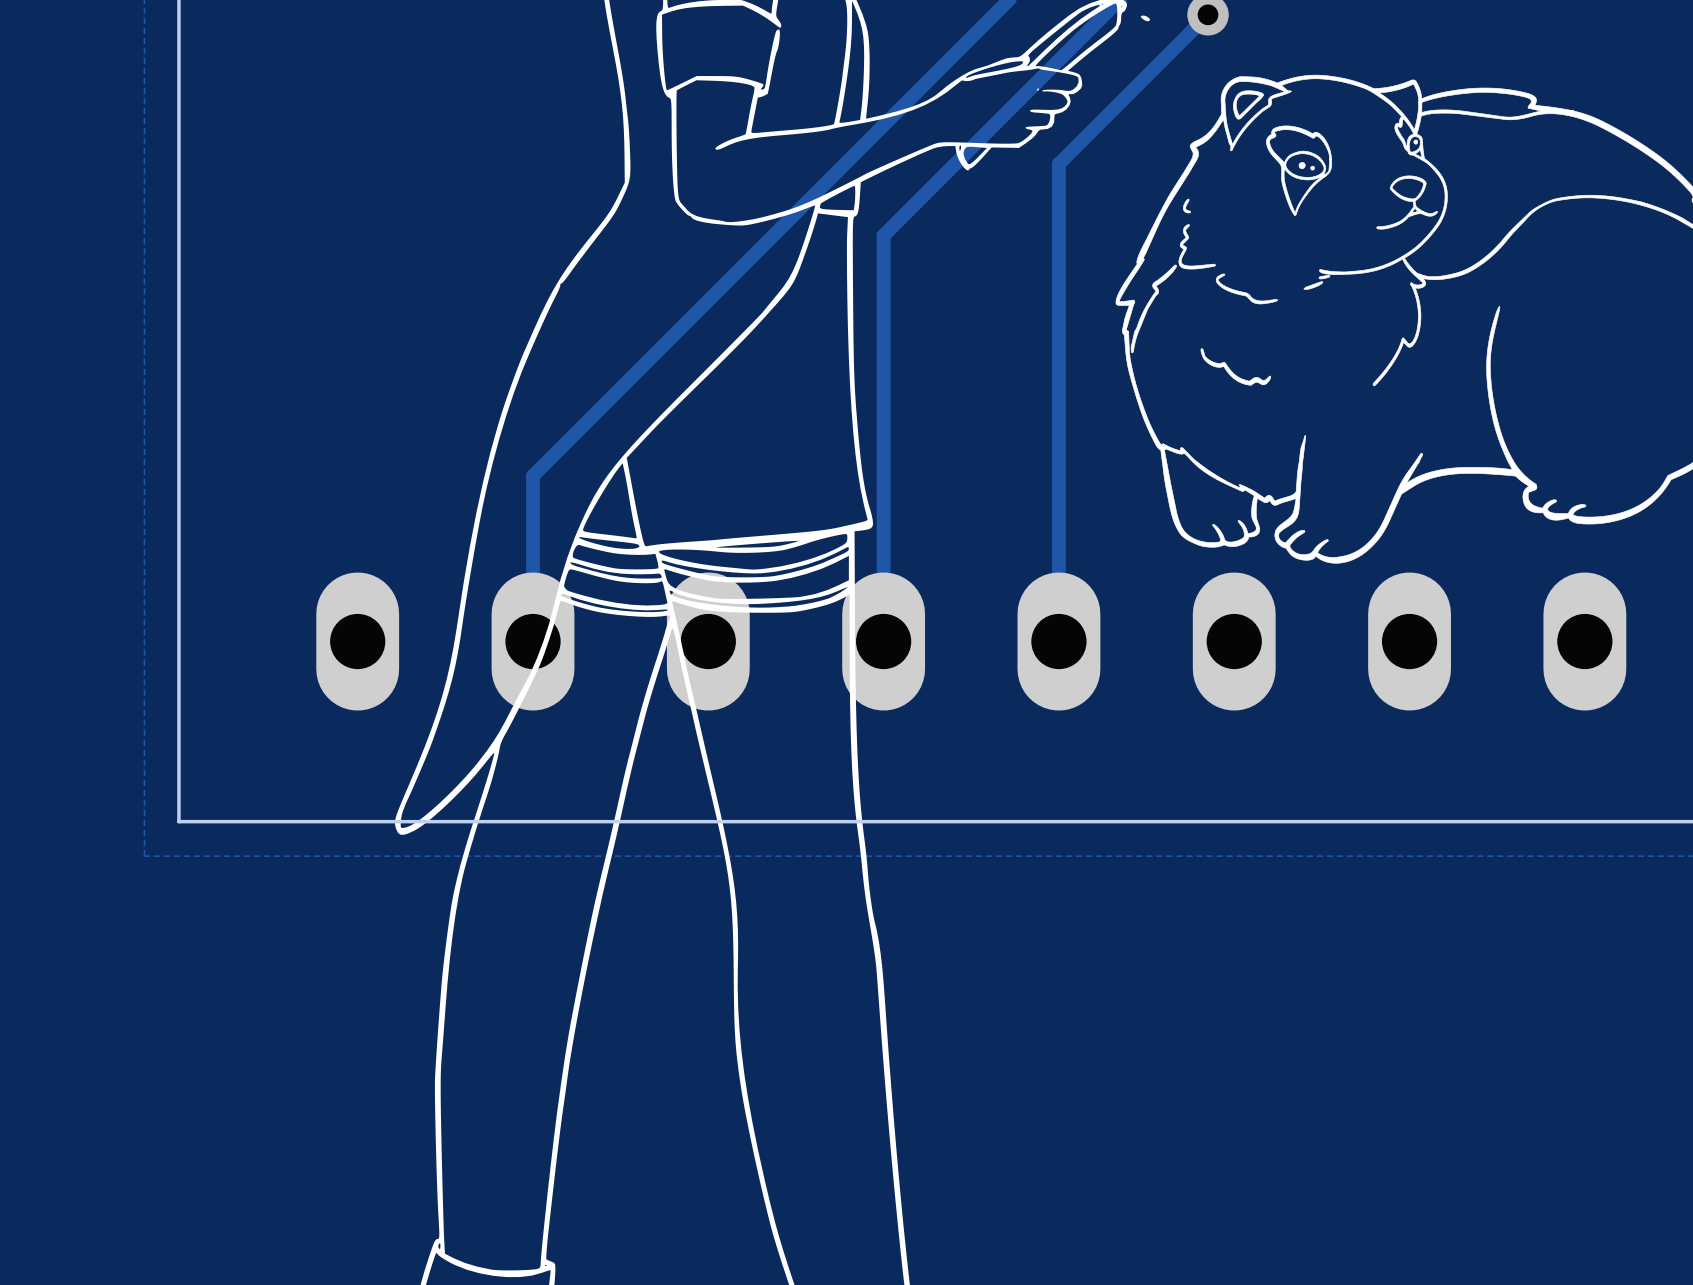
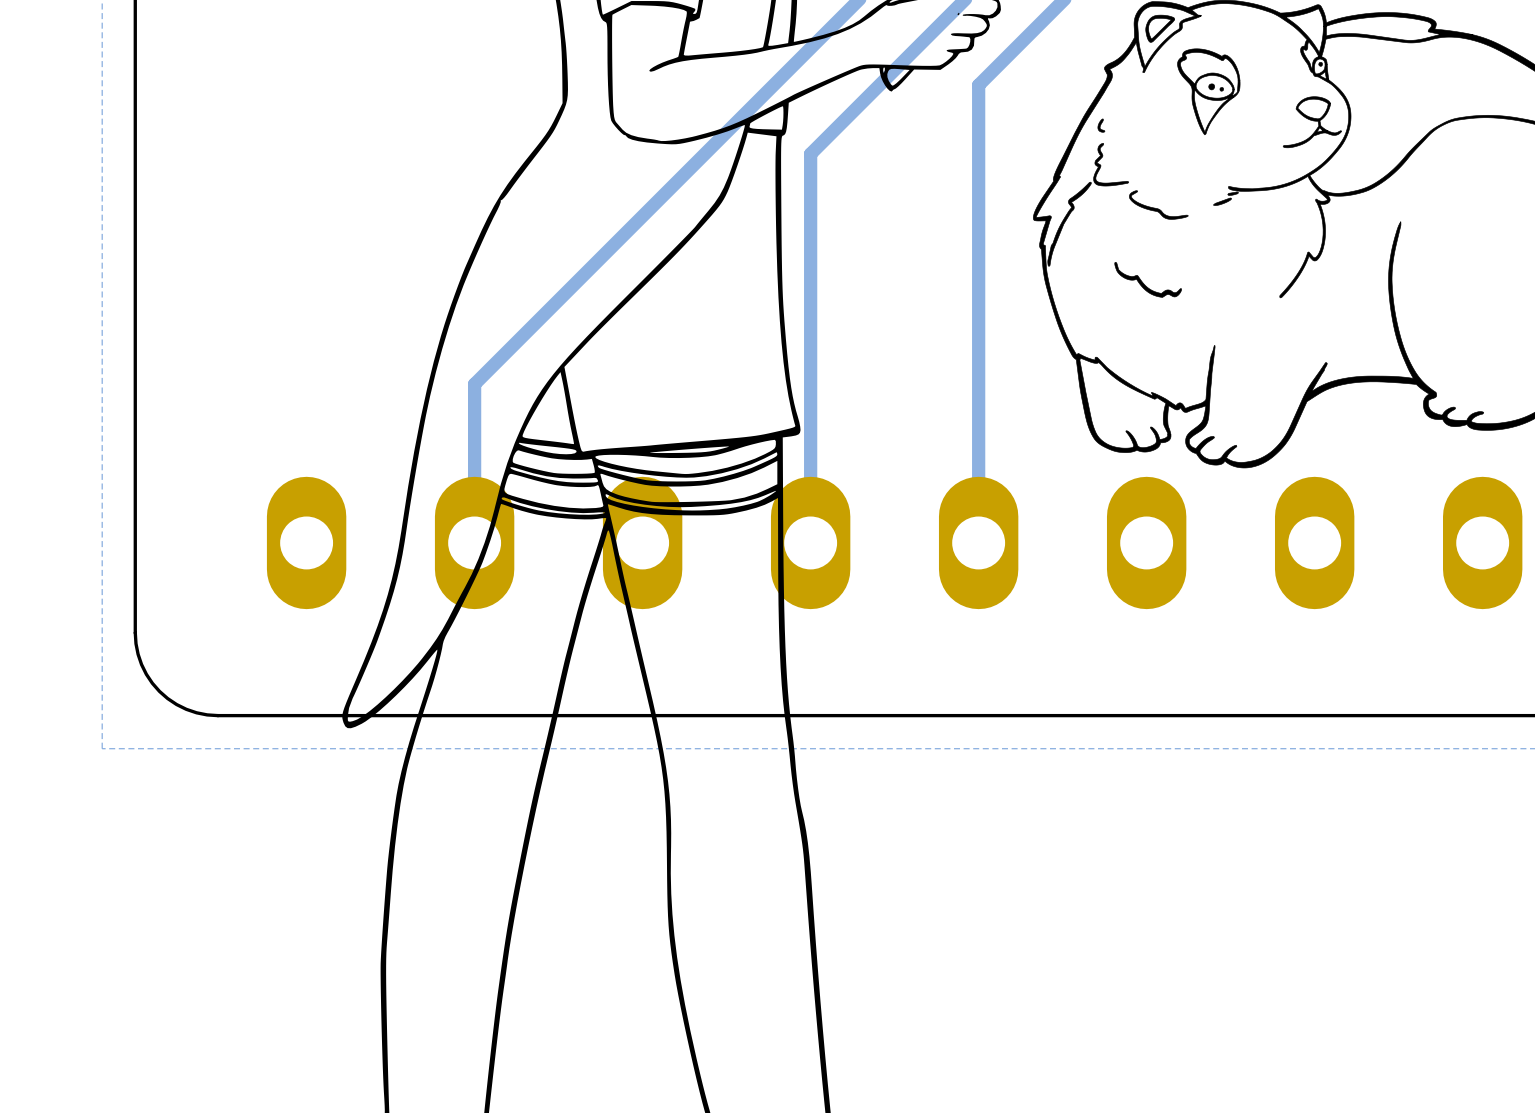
board edge: (178, 735) (178, 821) (265, 821) -> (135, 632) (141, 664) (159, 691) (186, 709) (217, 715)

